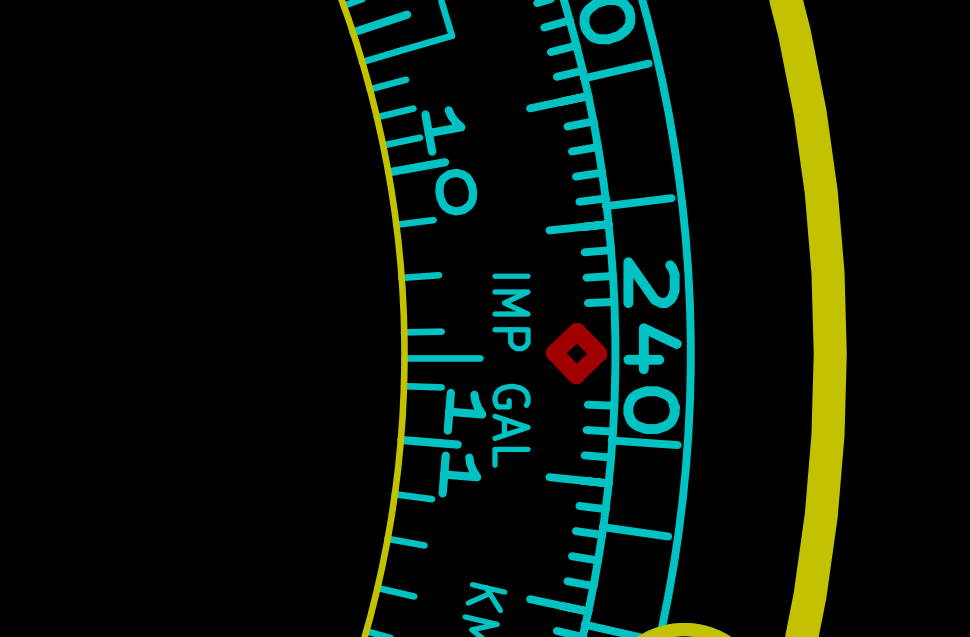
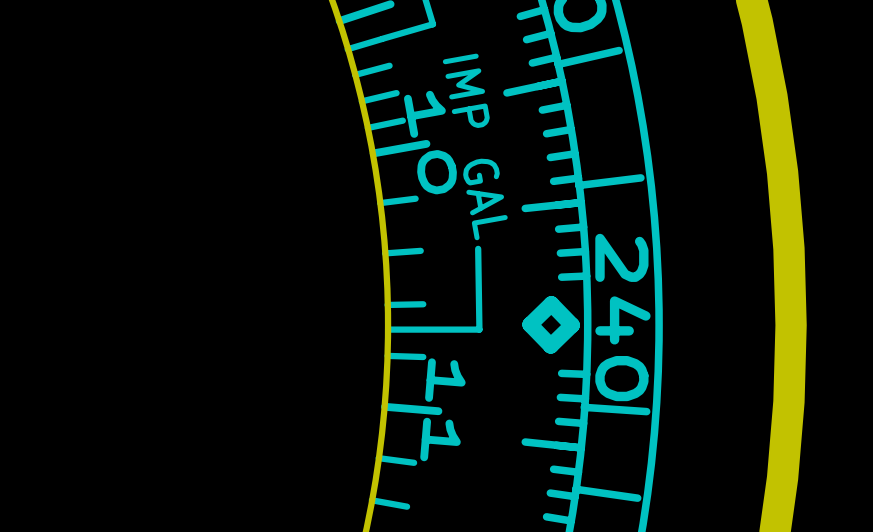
line: none -> (478, 248) (479, 329) (460, 329)
top track: (577, 331) (598, 353) (576, 375) (554, 353) (577, 331) -> none
line: none -> (551, 303) (572, 325) (550, 345) (530, 324) (551, 303)
text rotation: 0° (511, 370) -> 10.2° counterclockwise (475, 146)

